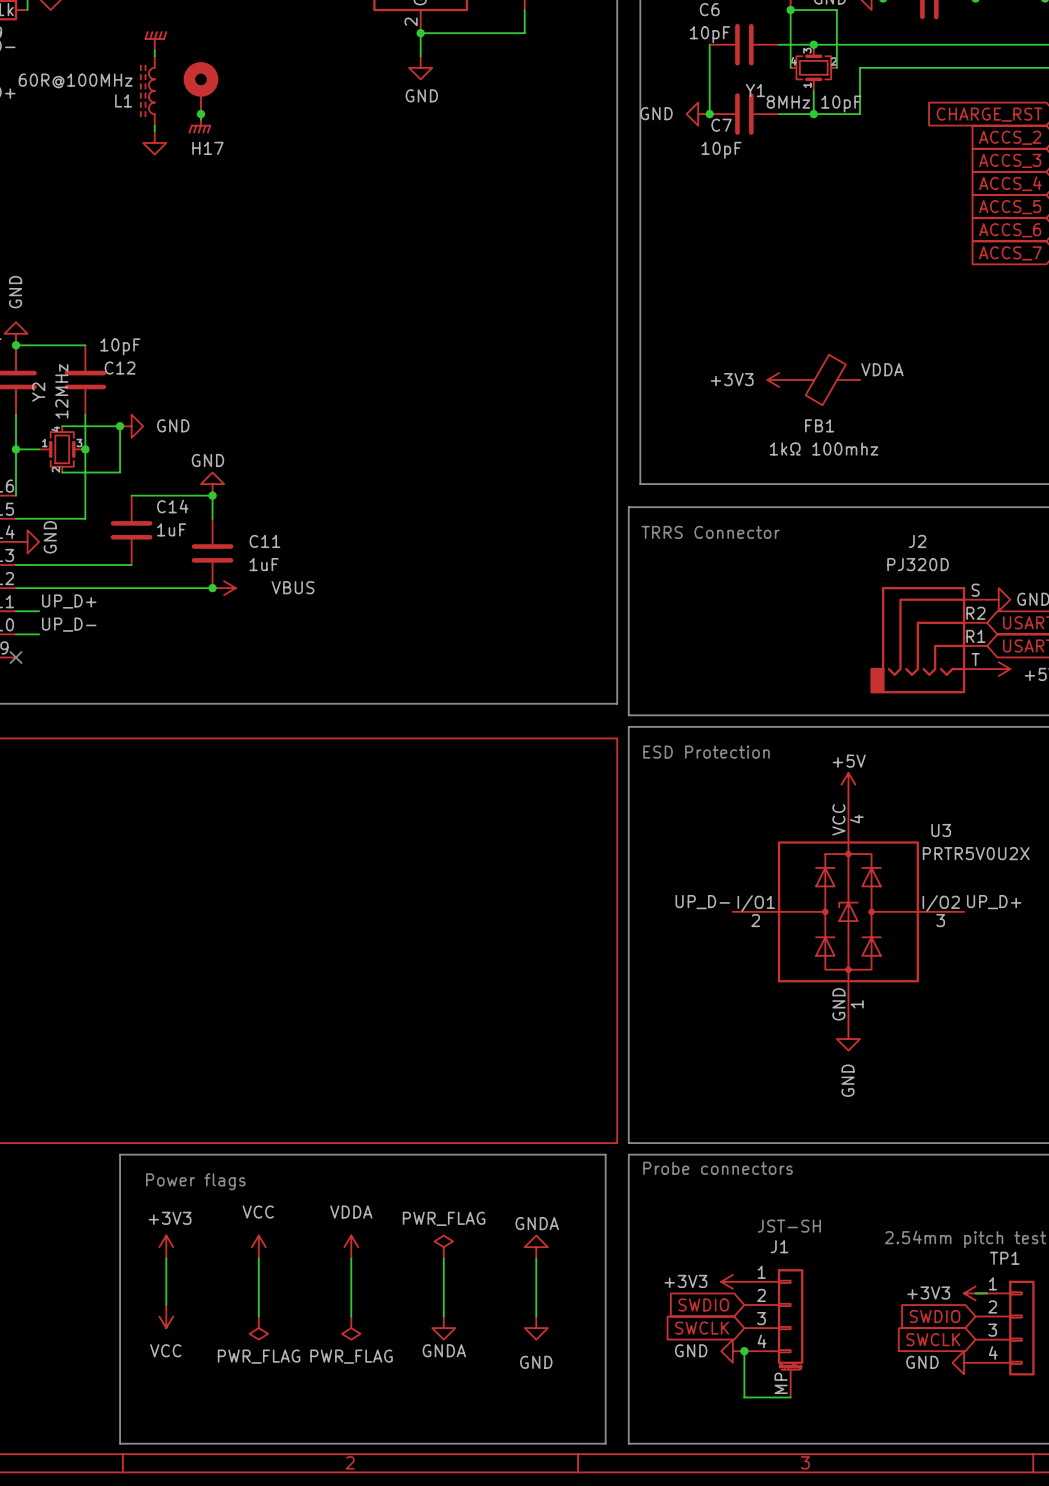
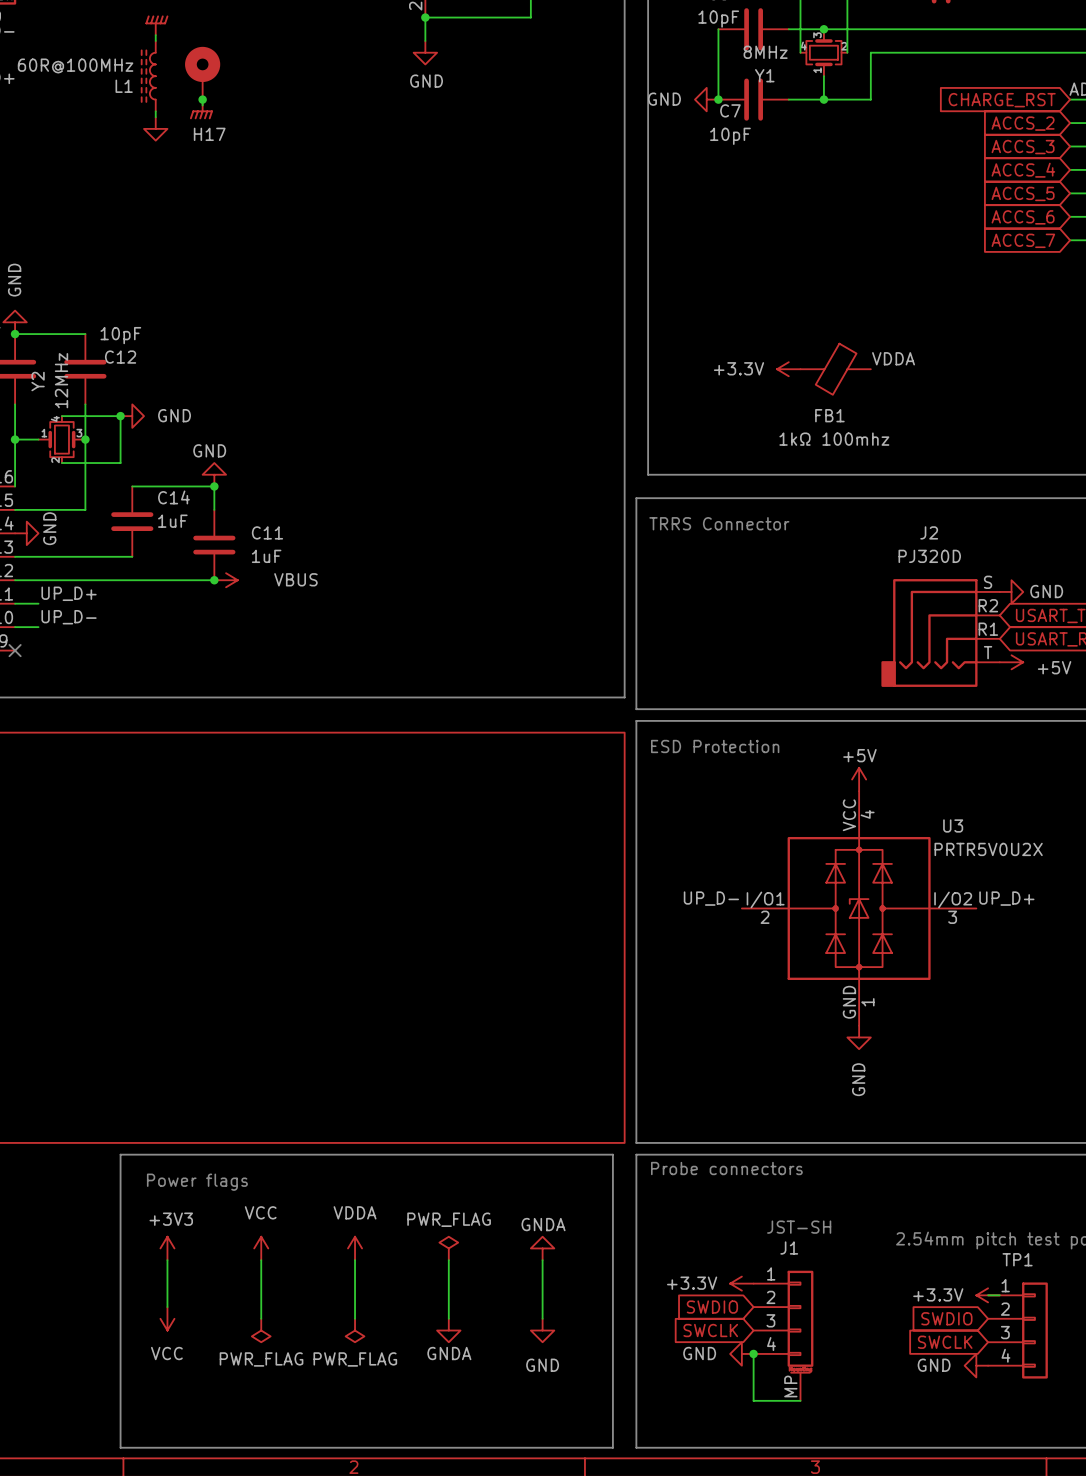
Y1 value: 8MHz 10pF (814, 104) -> 8MHz (765, 52)
power symbol: +3V3 (779, 380) -> +3.3V (788, 369)
power symbol: +3V3 (732, 1281) -> +3.3V (741, 1283)
power symbol: +3V3 (975, 1293) -> +3.3V (988, 1295)

